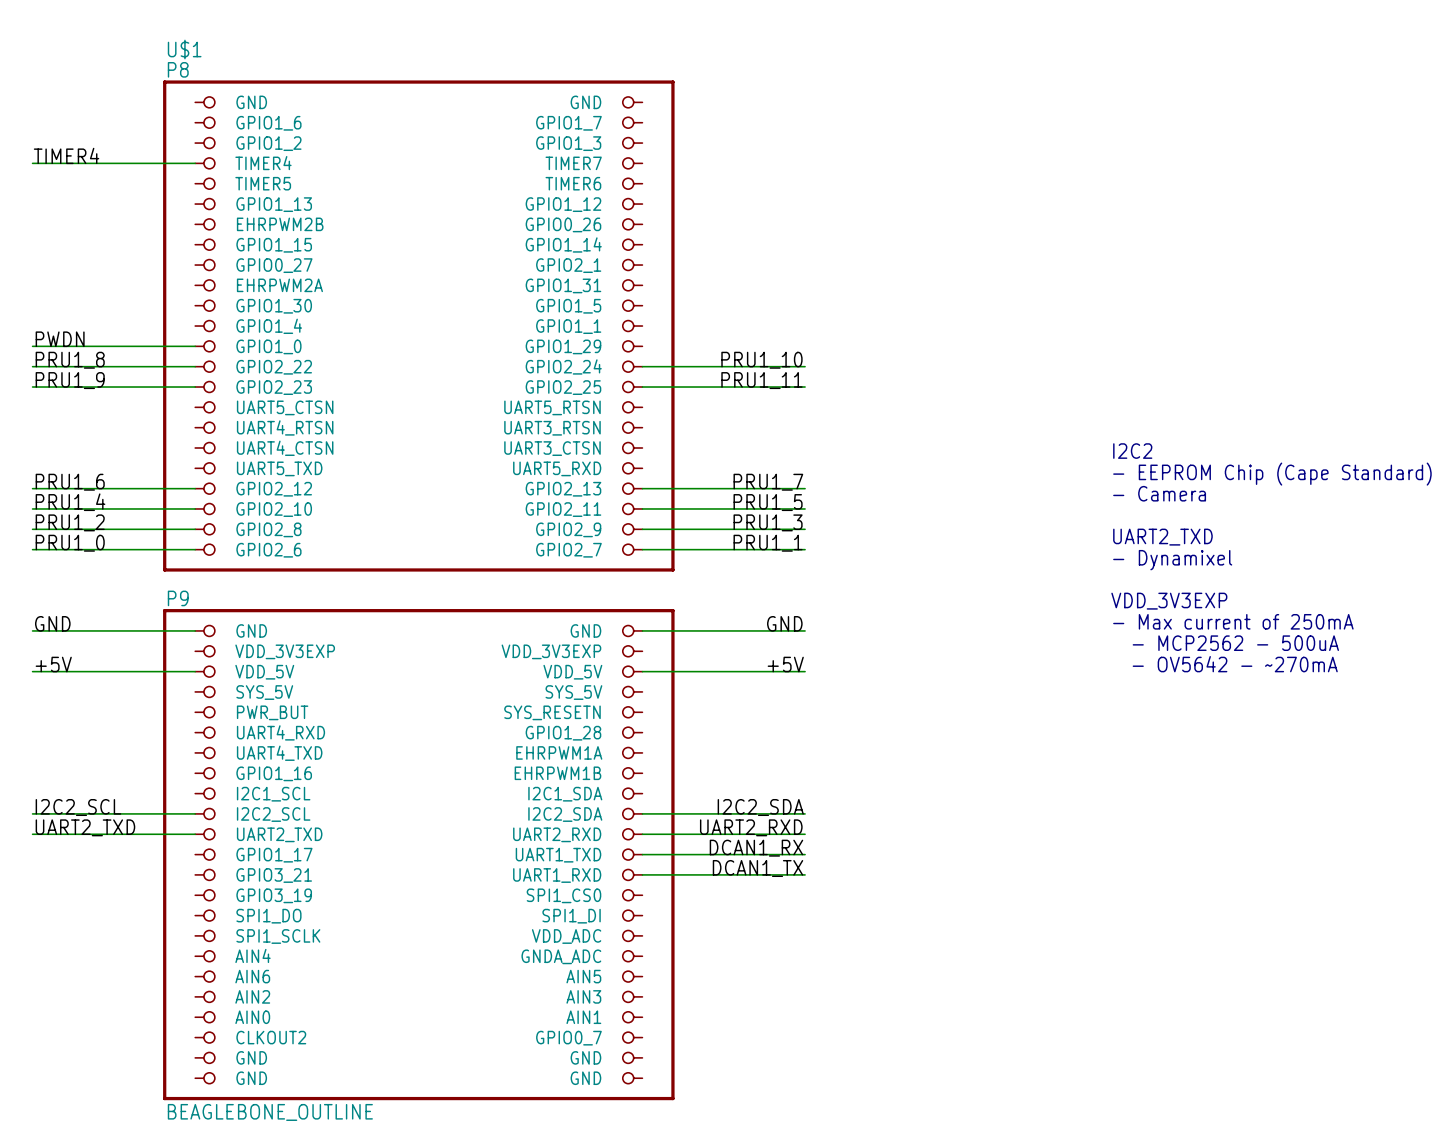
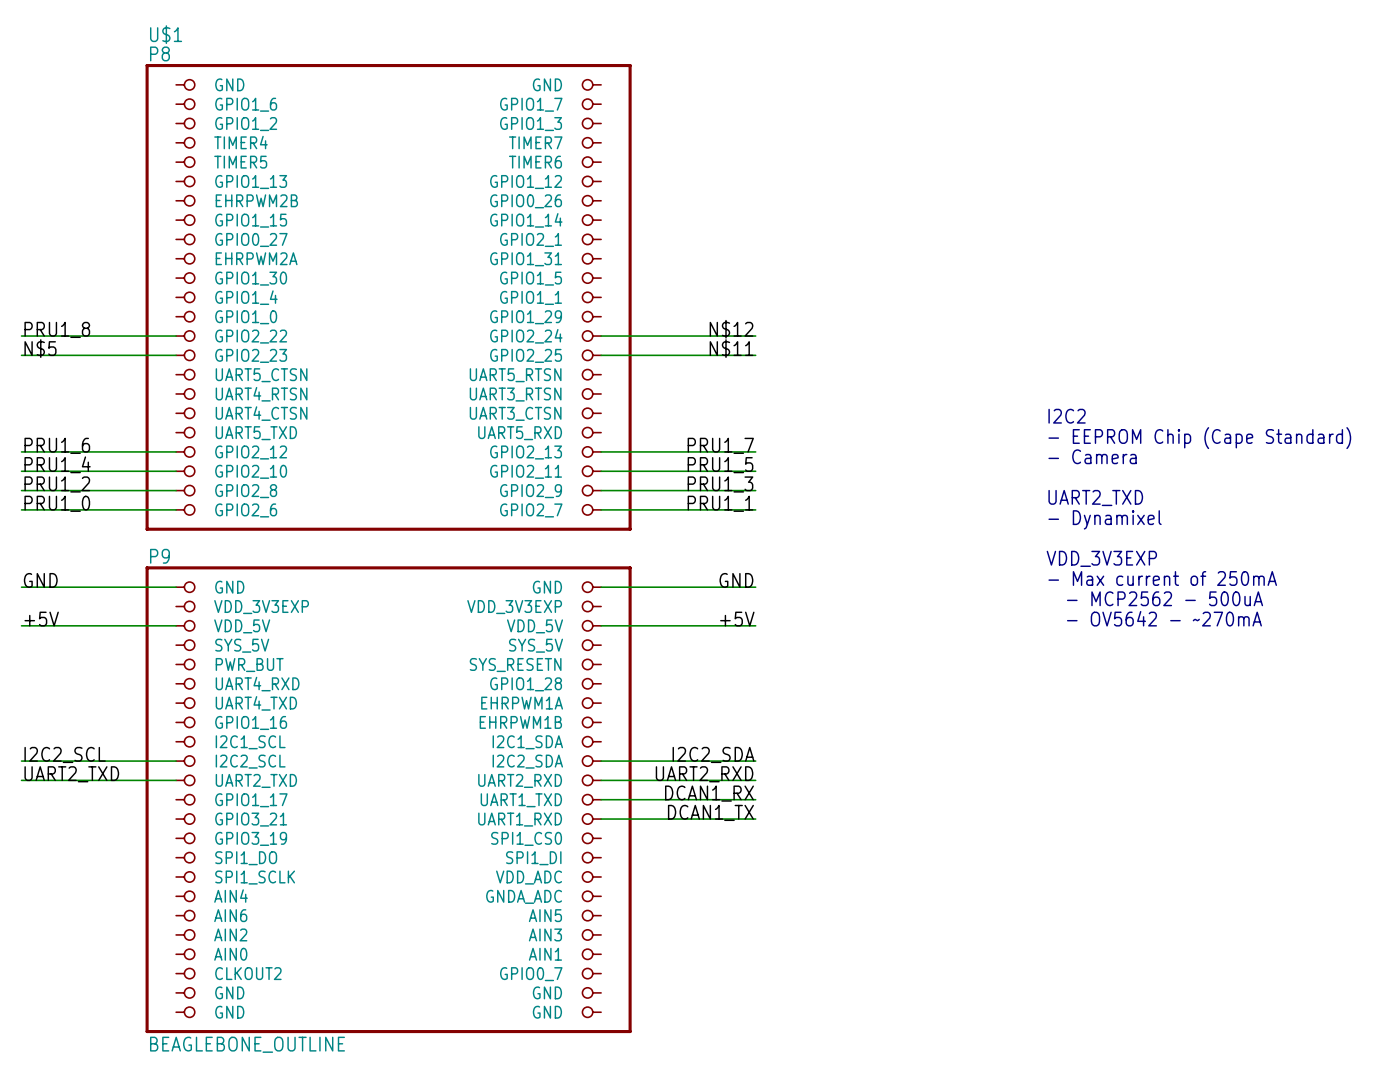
label: TIMER4 (66, 155) -> none
wire: (32, 163) (195, 163) -> none
label: PWDN (60, 339) -> none
wire: (32, 346) (195, 346) -> none
label: PRU1_10 (761, 360) -> N$12 (731, 329)
label: PRU1_9 (70, 380) -> N$5 (40, 348)
label: PRU1_11 (761, 380) -> N$11 (731, 348)

